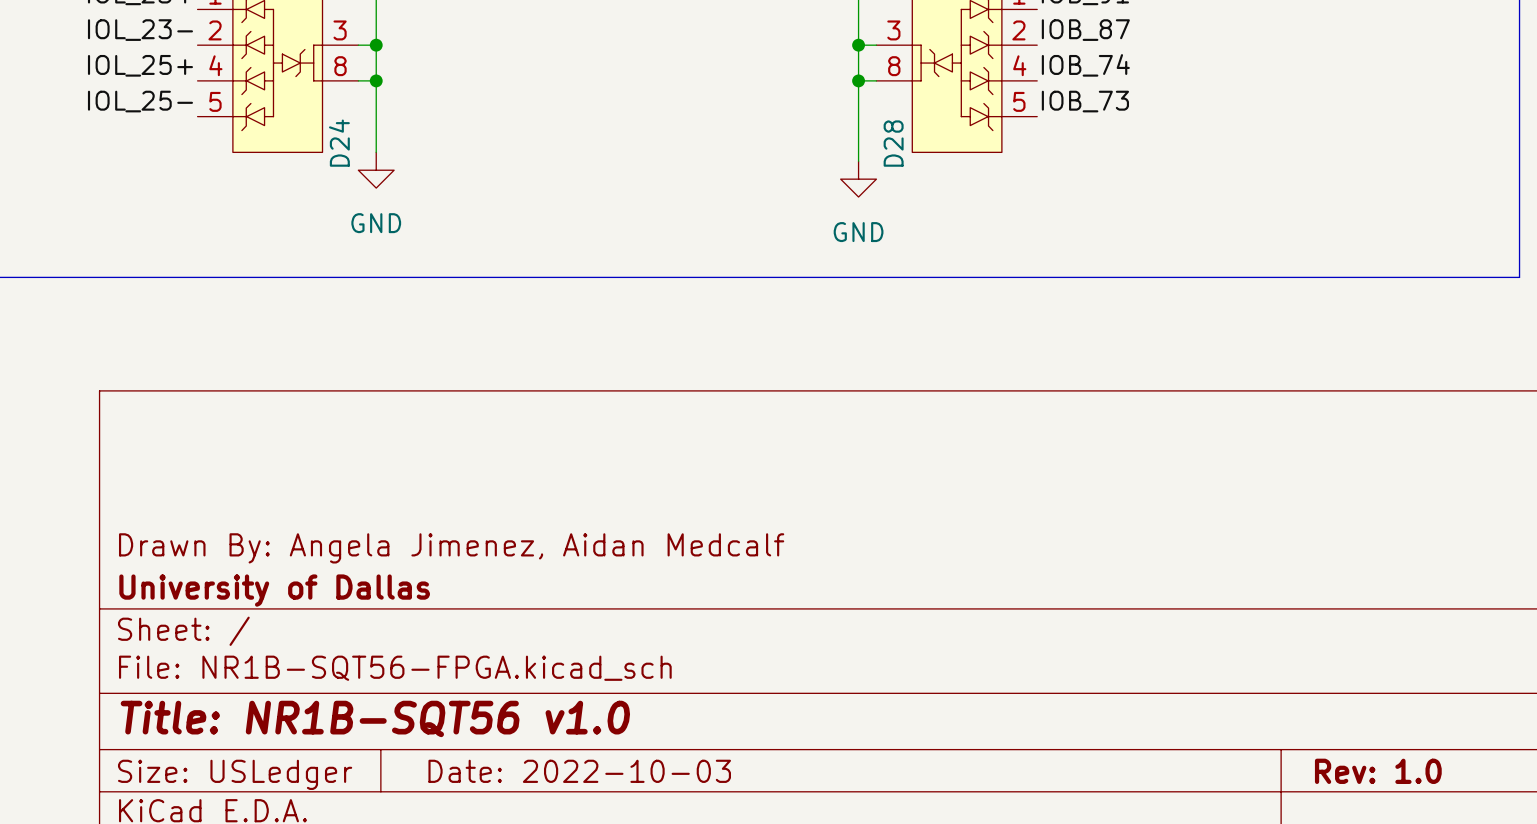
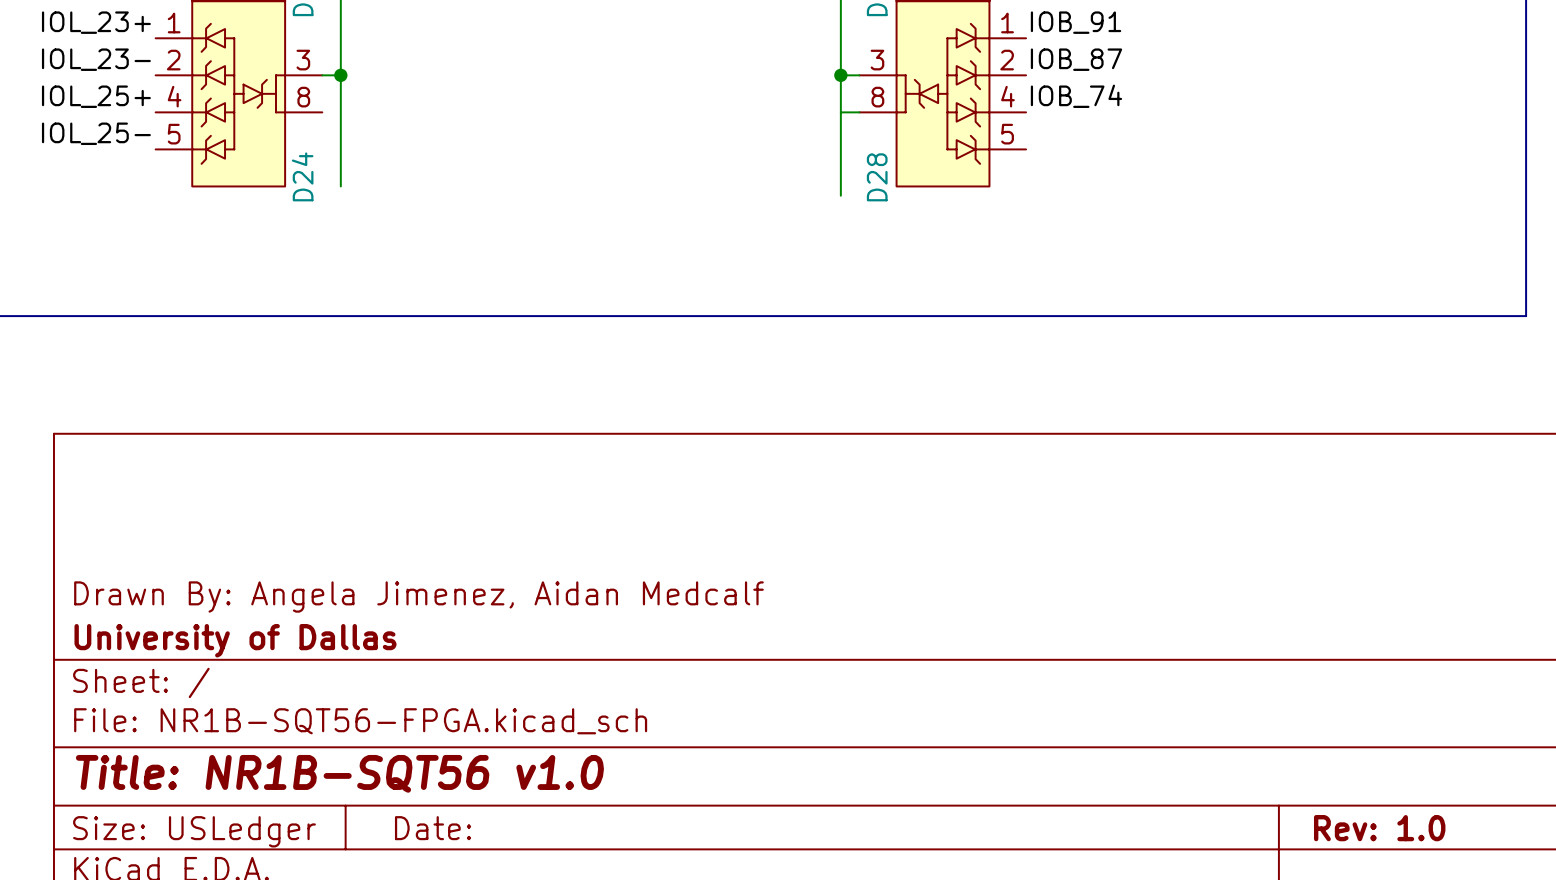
wire: (358, 80) (376, 80) -> none
junction: (376, 80) -> none
junction: (858, 80) -> none
label: IOB_73 (1085, 101) -> none
power symbol: GND (376, 170) -> none
power symbol: GND (858, 179) -> none
title block: Date: 2022-10-03 (579, 771) -> Date: (433, 828)

